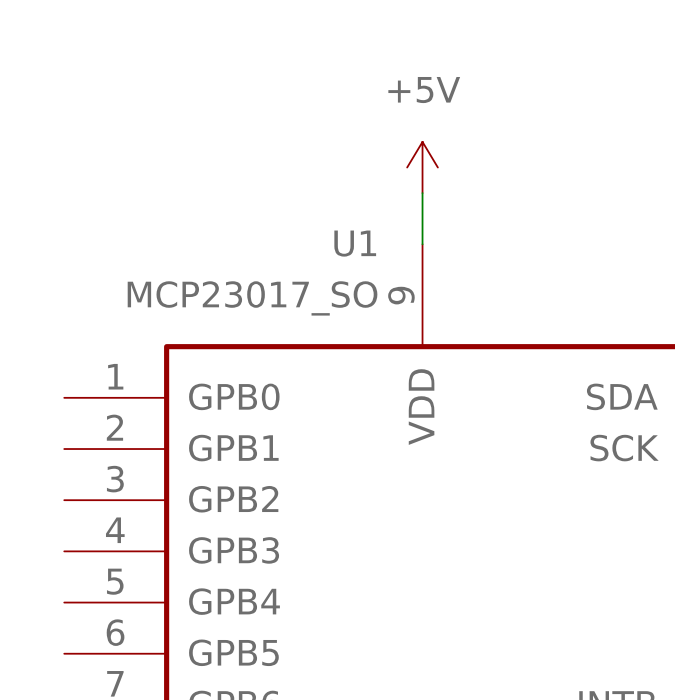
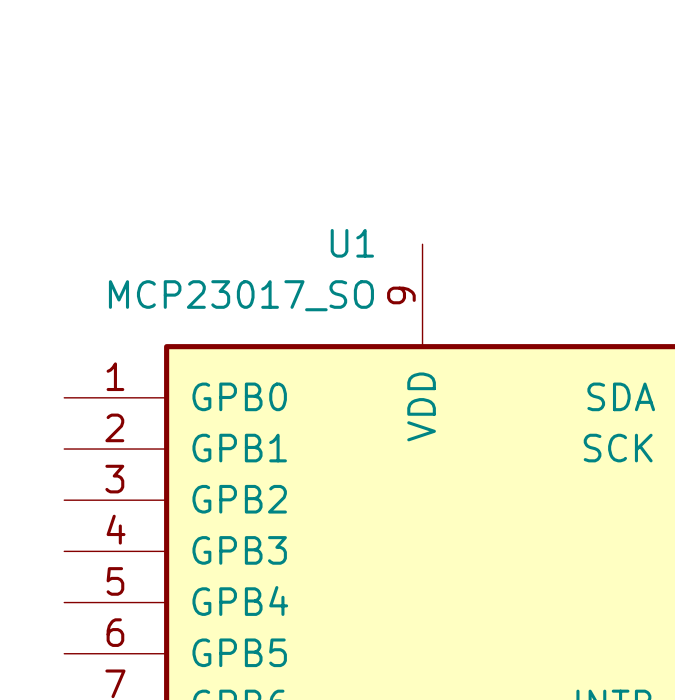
power symbol: +5V (422, 167) -> none
wire: (422, 193) (422, 244) -> none

